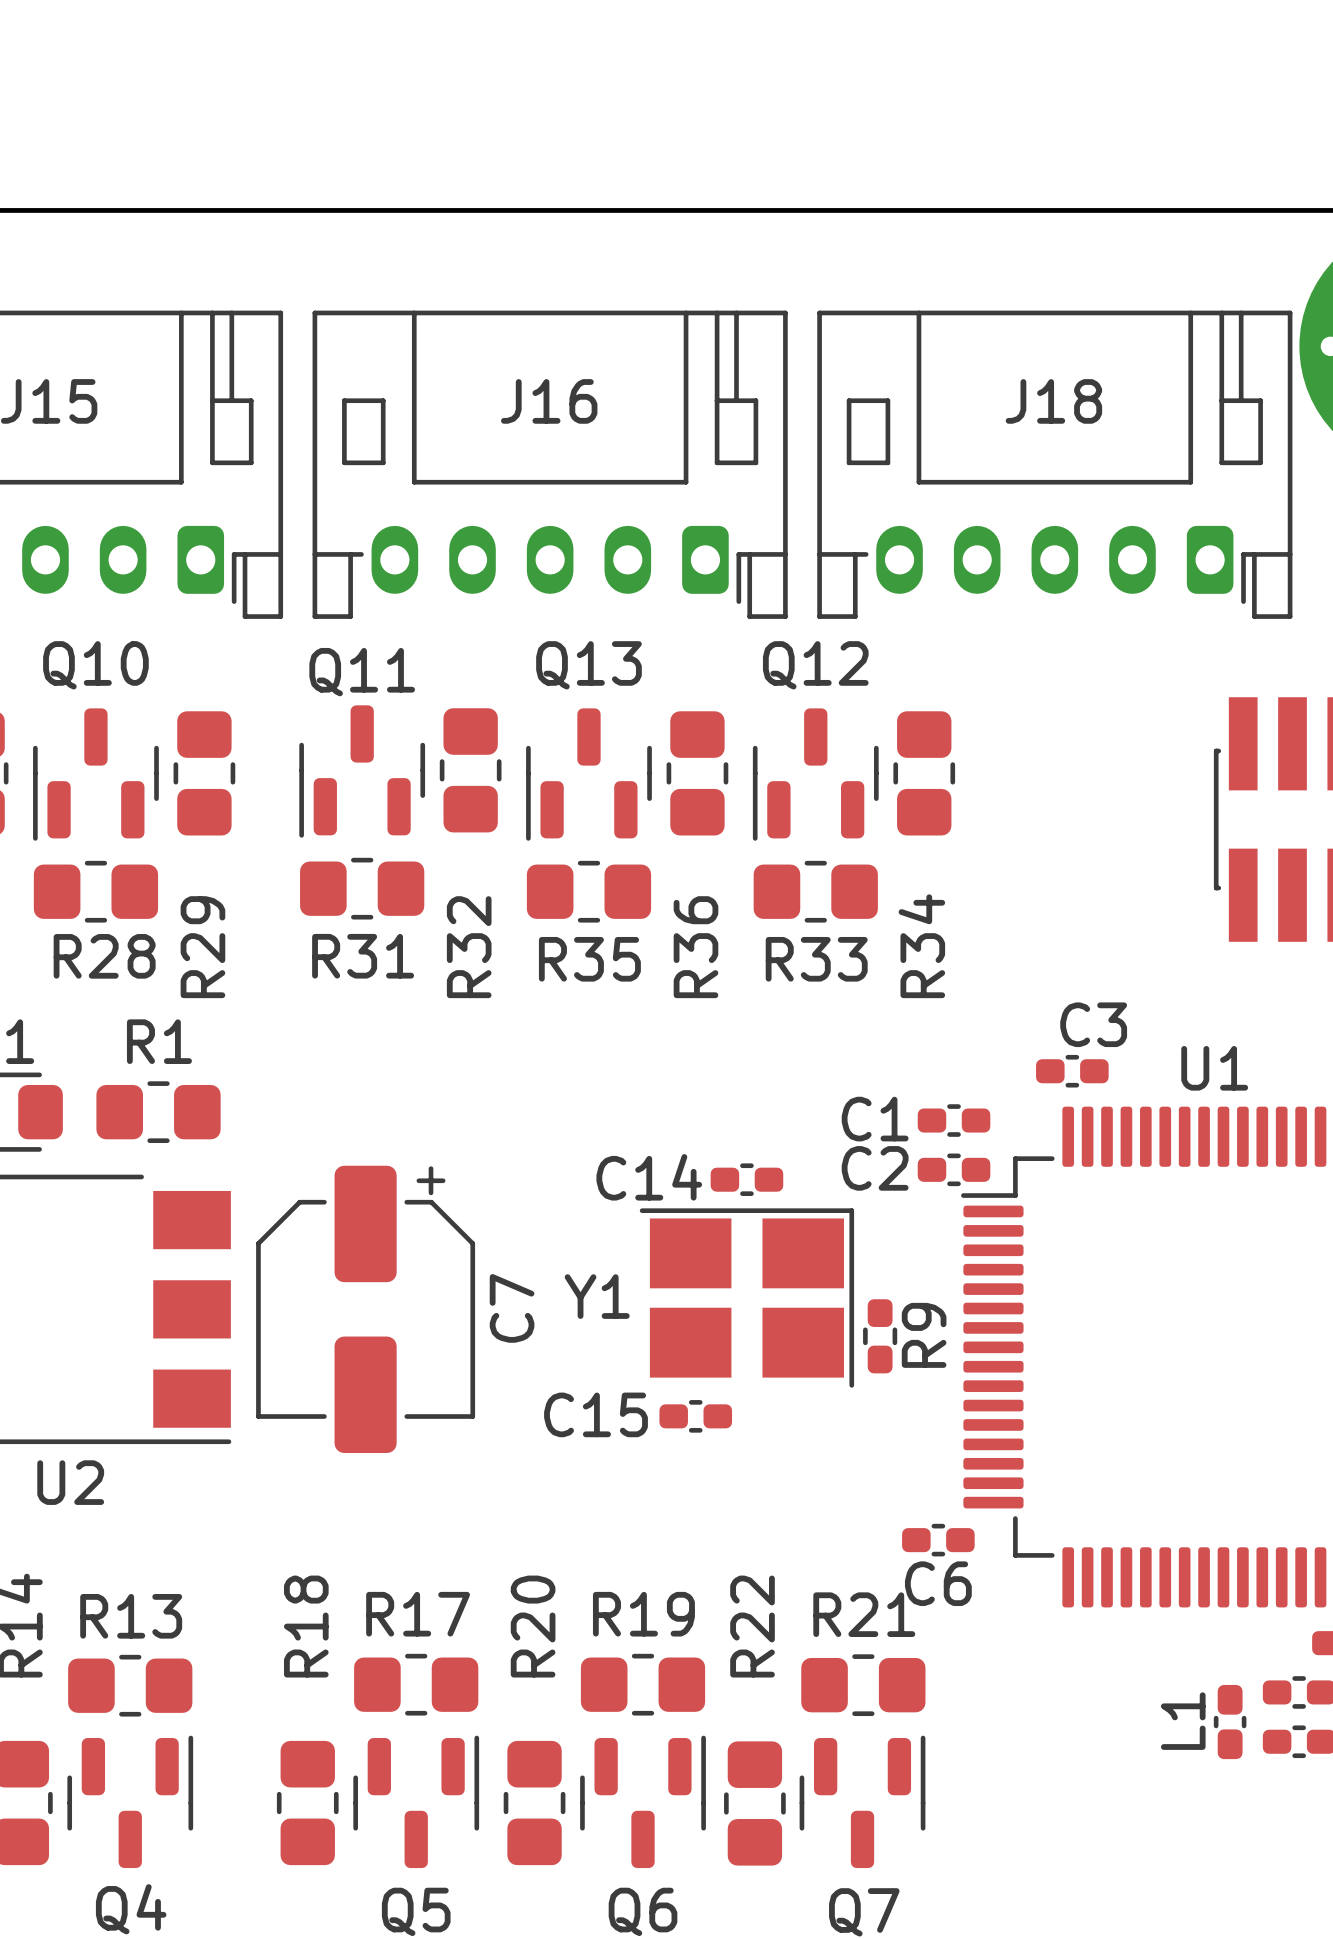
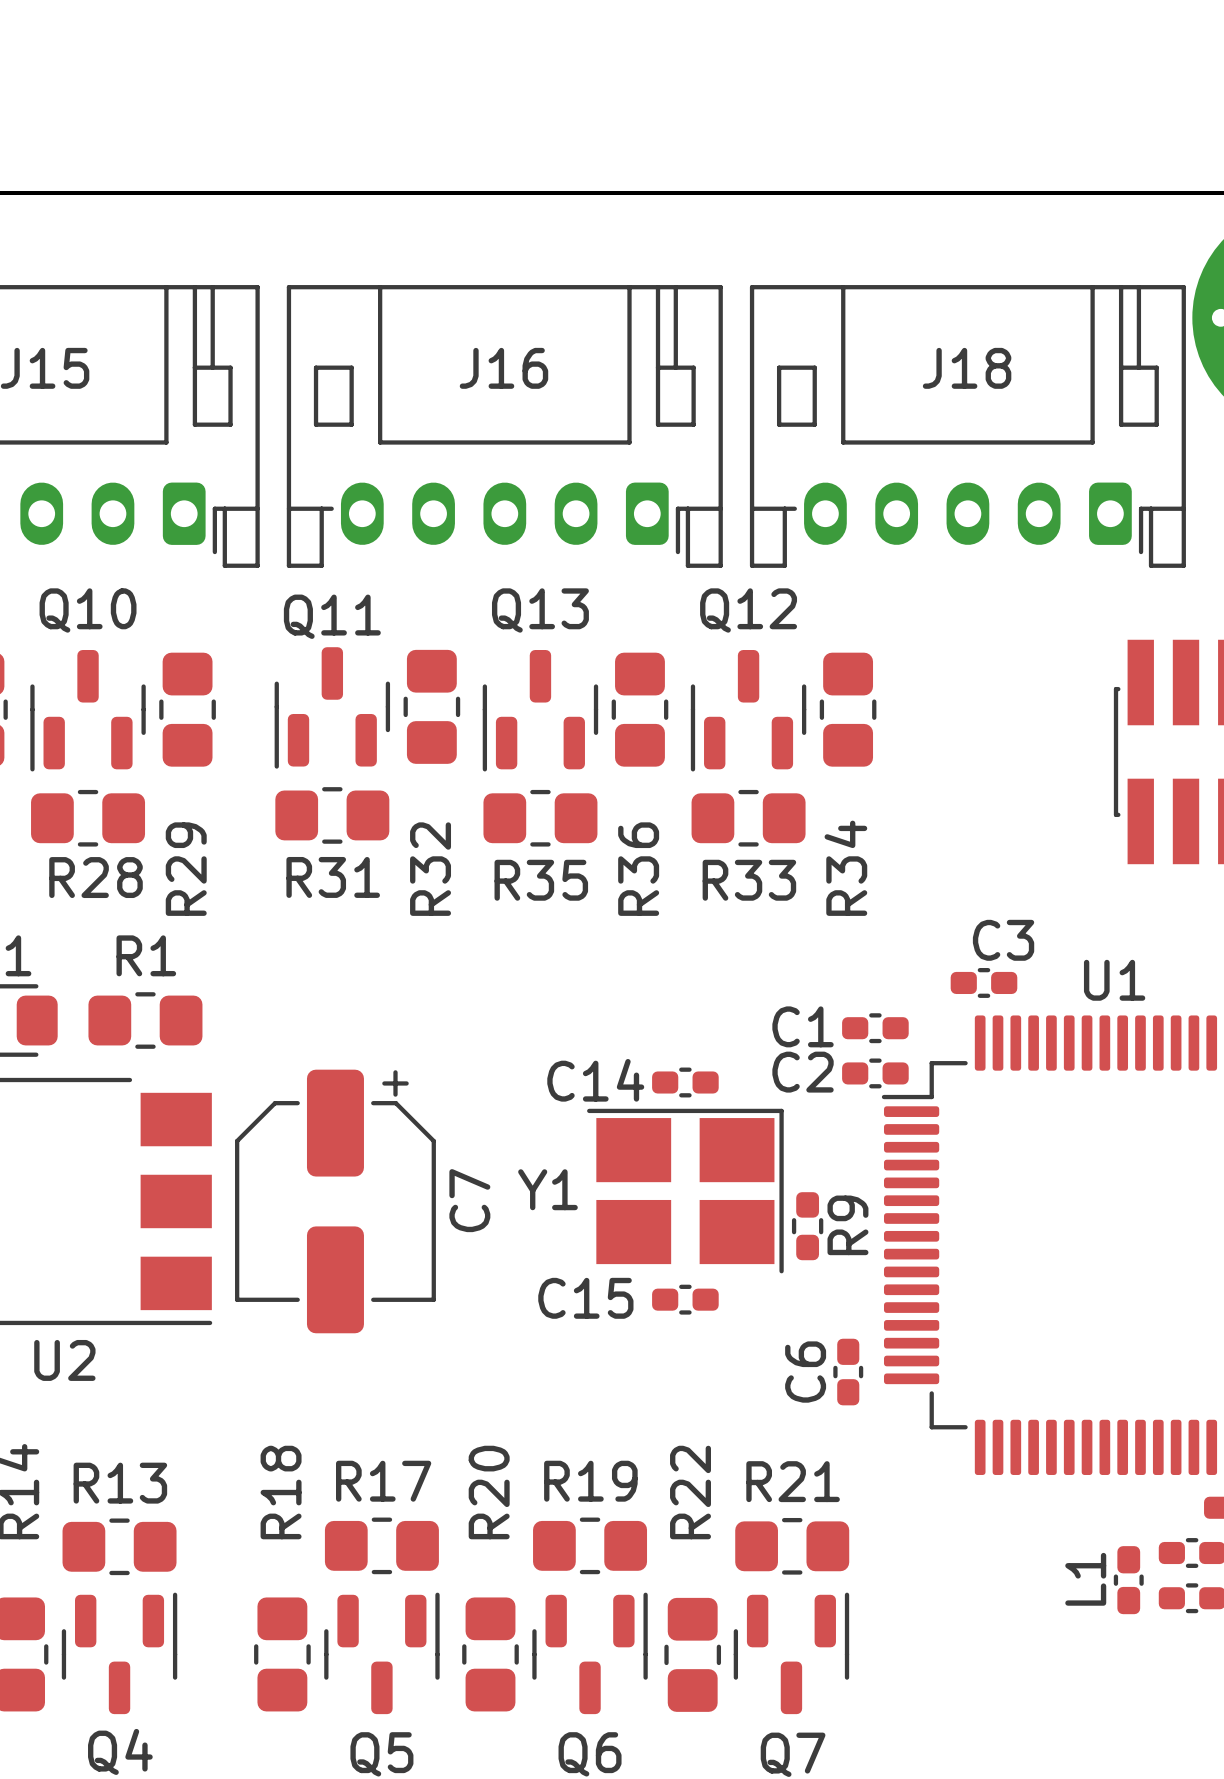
C15 name position: C15 (596, 1414) -> C15 (585, 1298)
C15 position: (695, 1416) -> (685, 1299)
C6 rotation: 0° (938, 1540) -> 90° clockwise (848, 1372)
C6 position: (938, 1540) -> (848, 1372)

